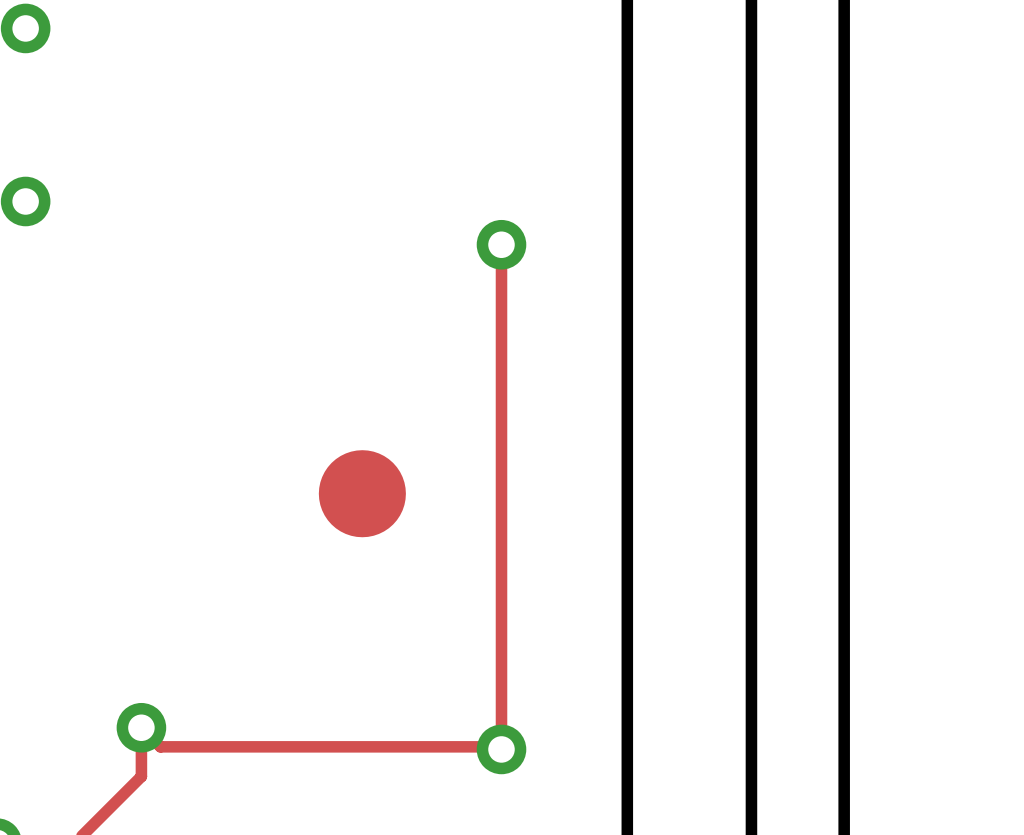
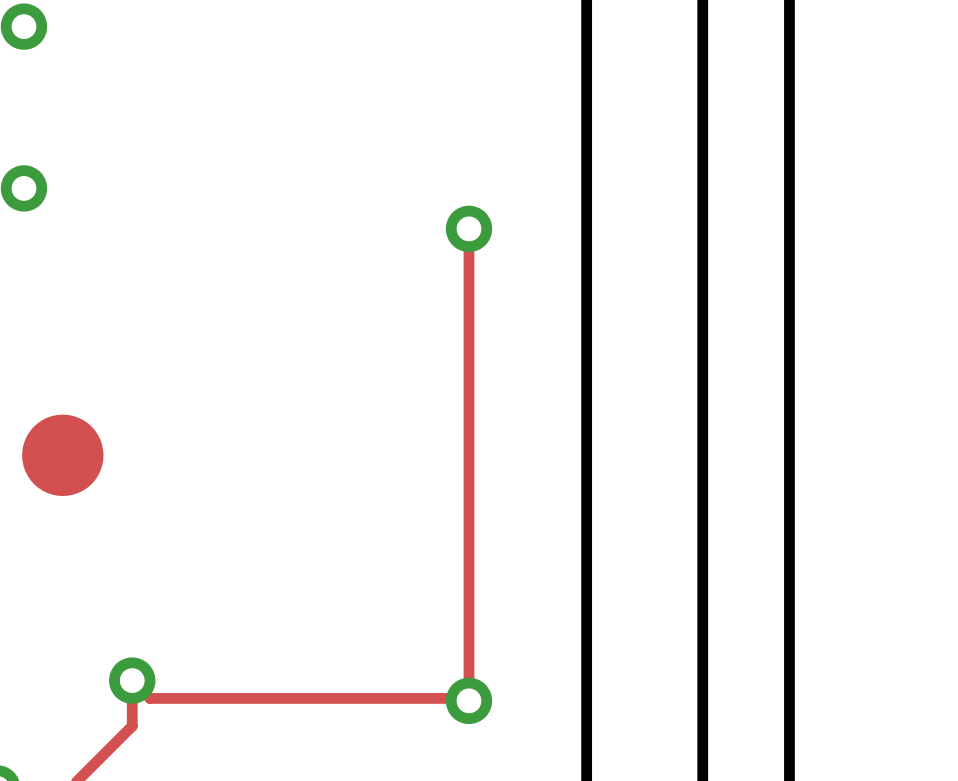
drawing position: (362, 493) -> (62, 455)

